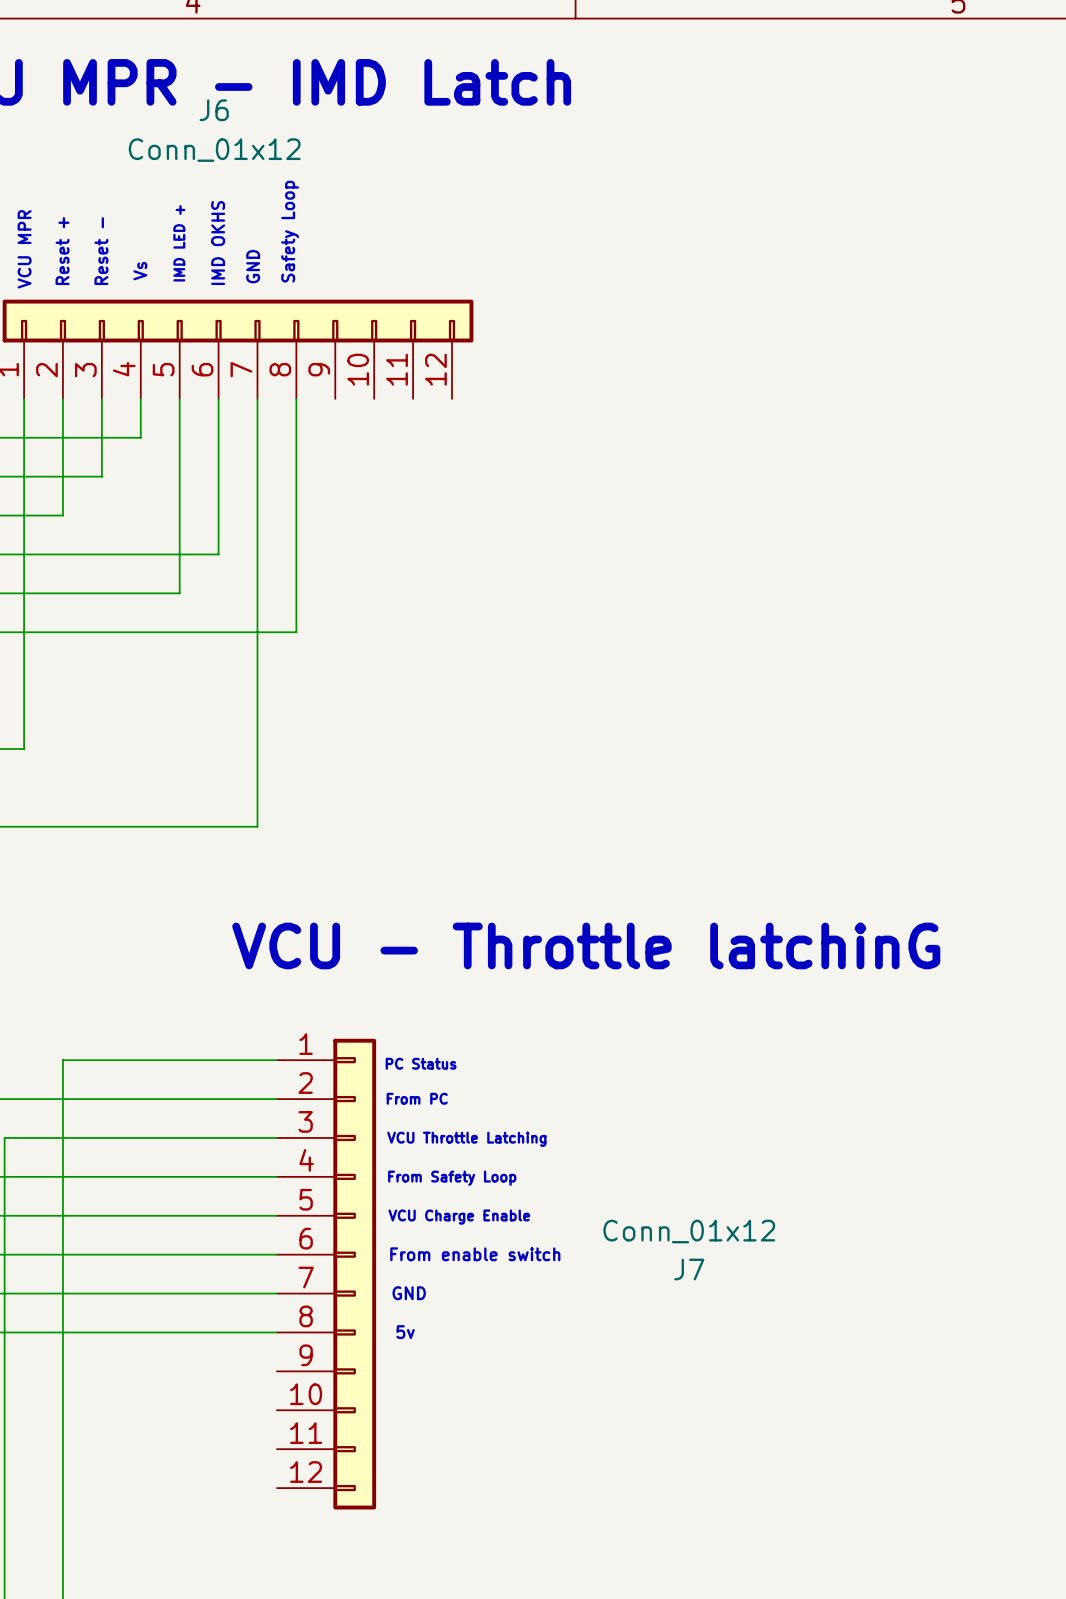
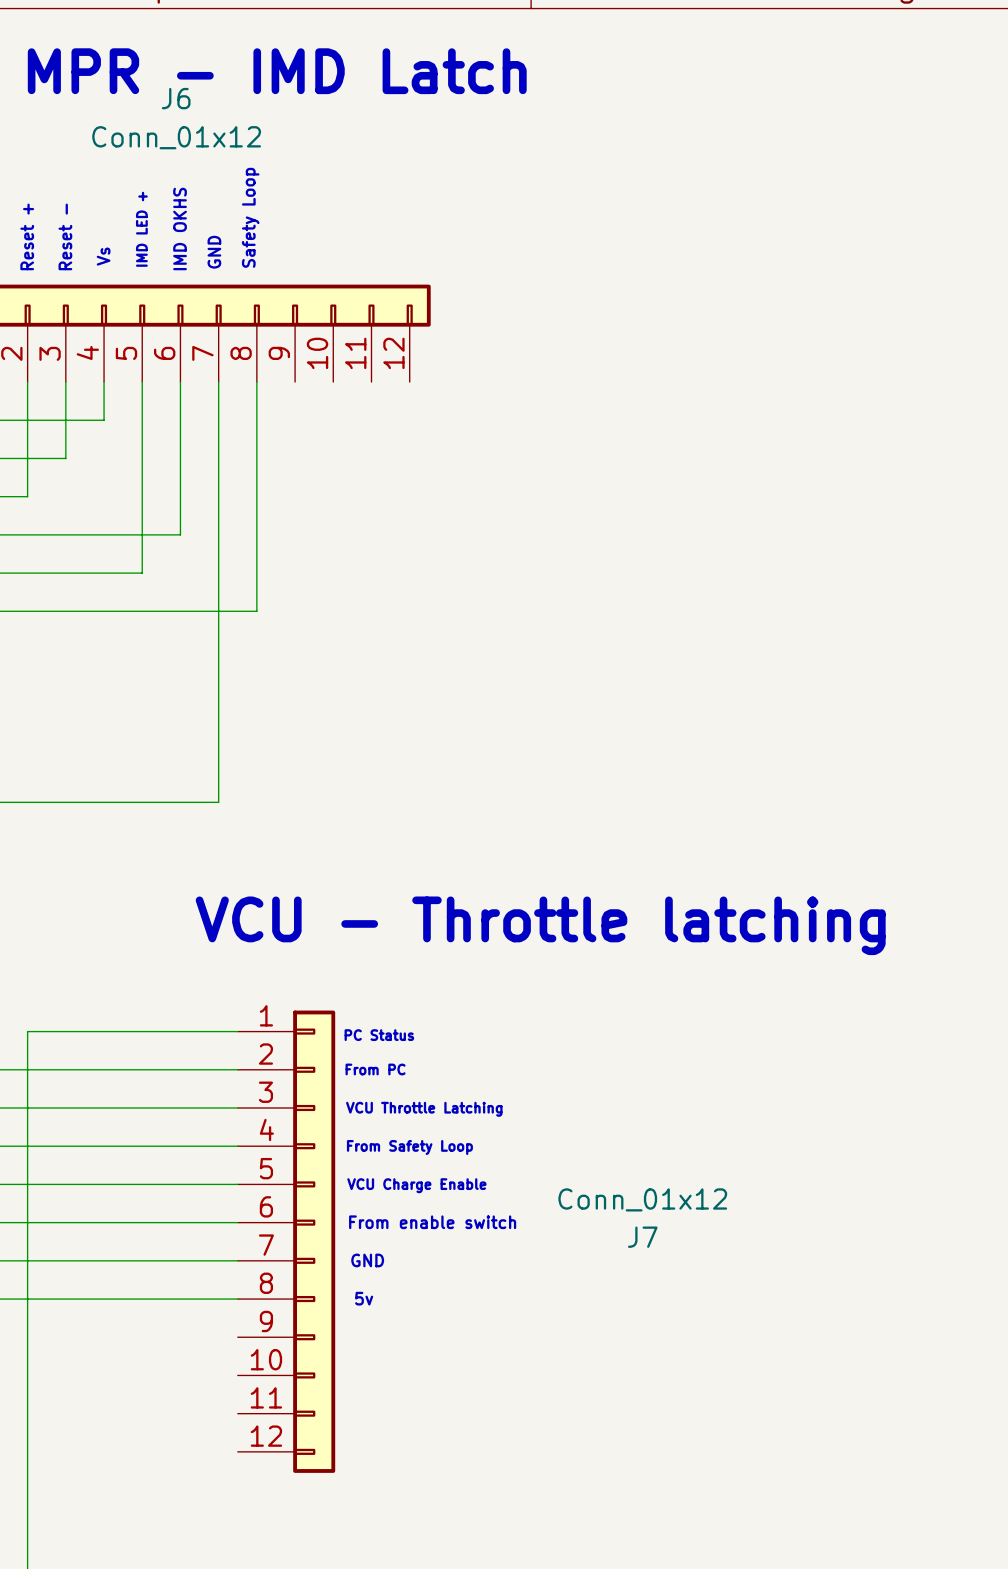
text: VCU - Throttle latchinG (586, 945) -> VCU - Throttle latching (540, 925)

